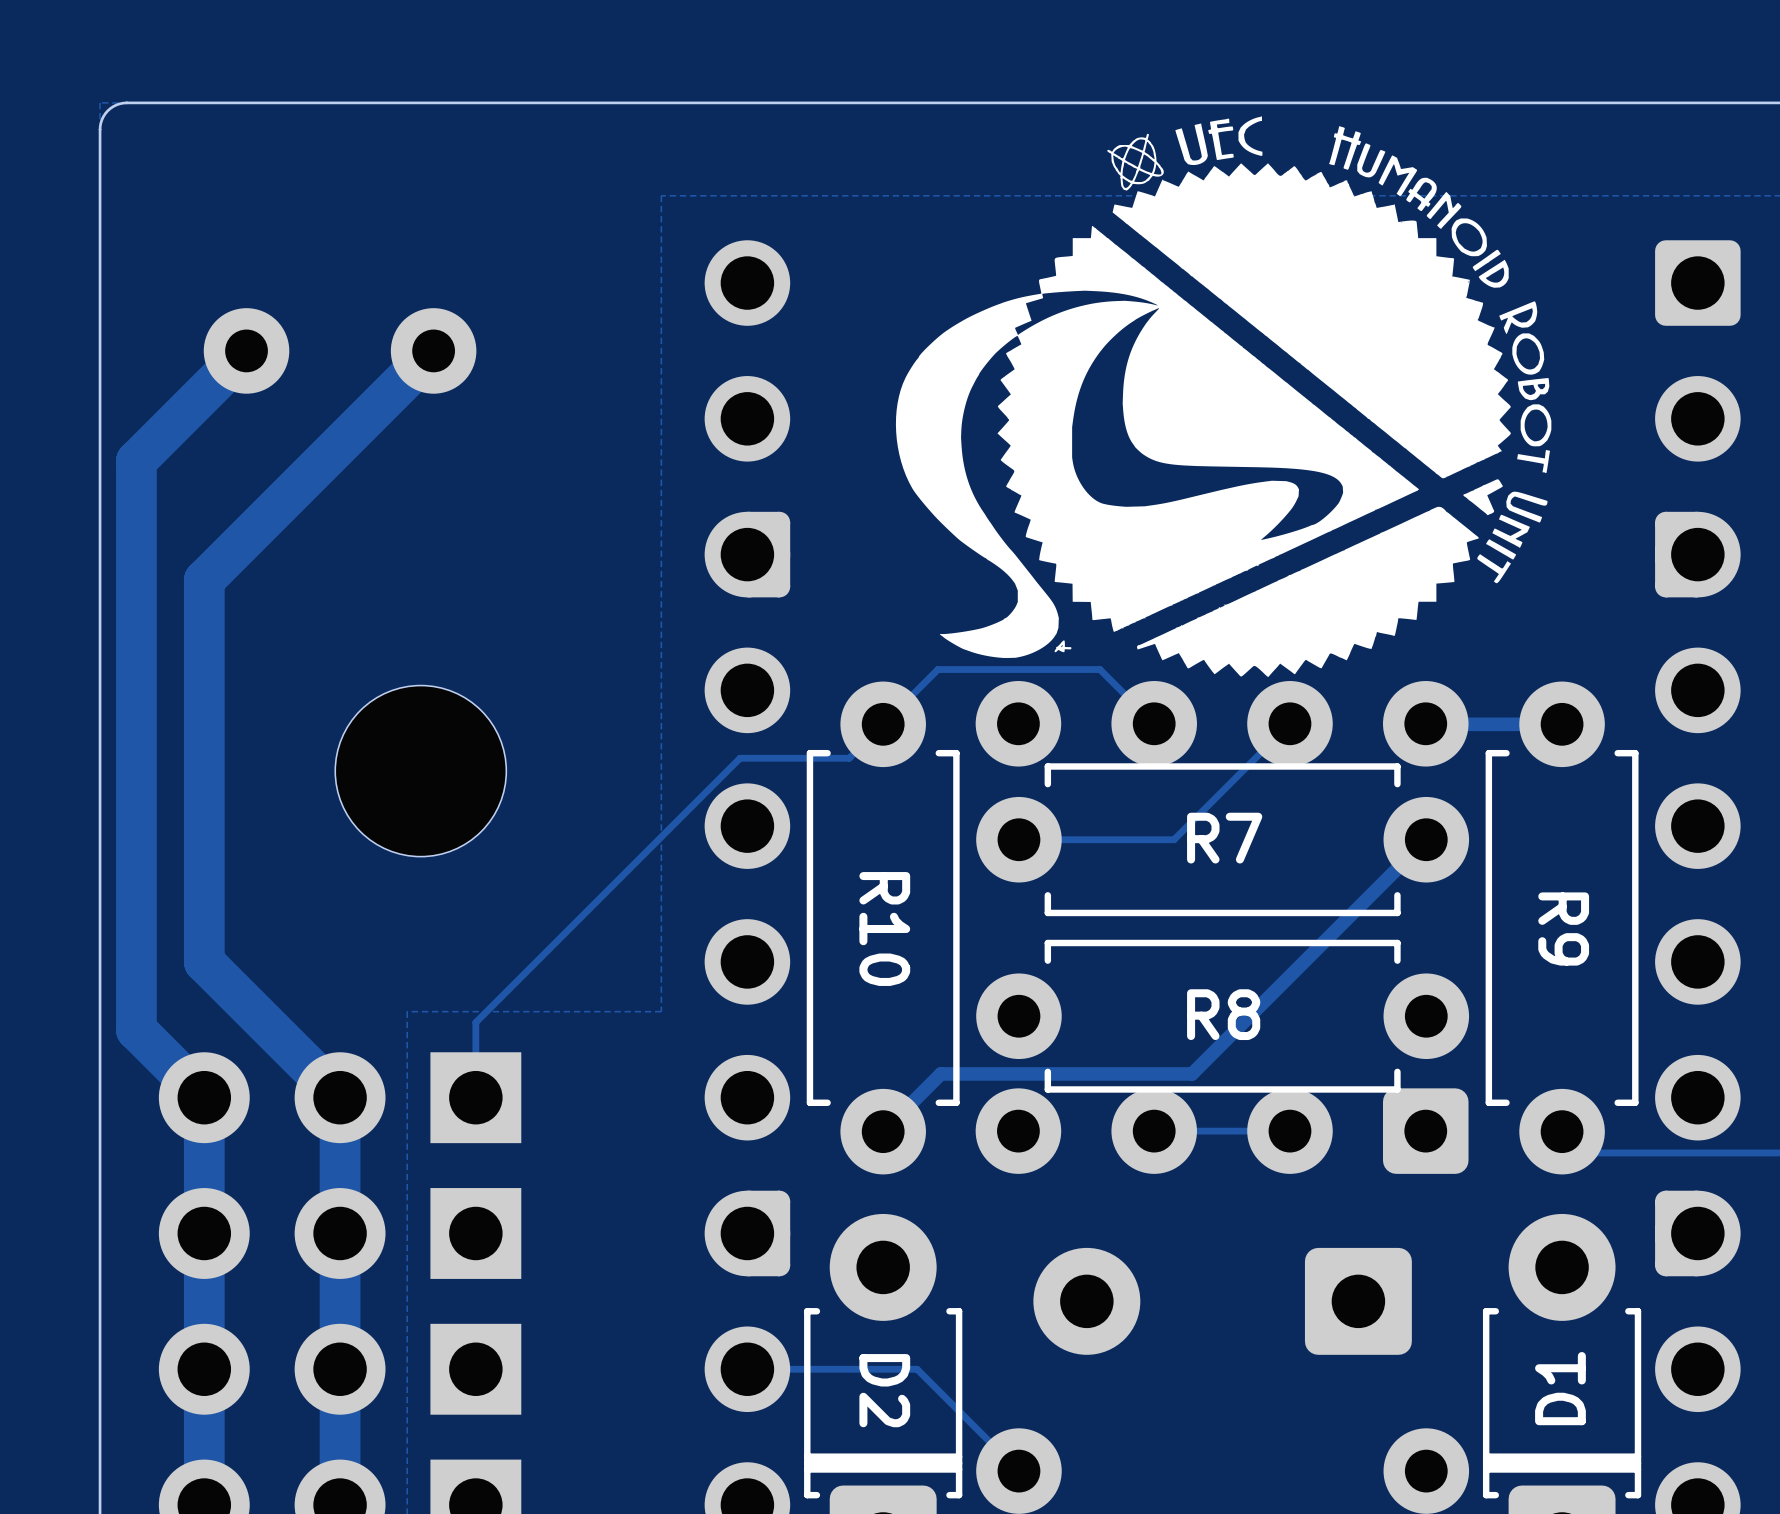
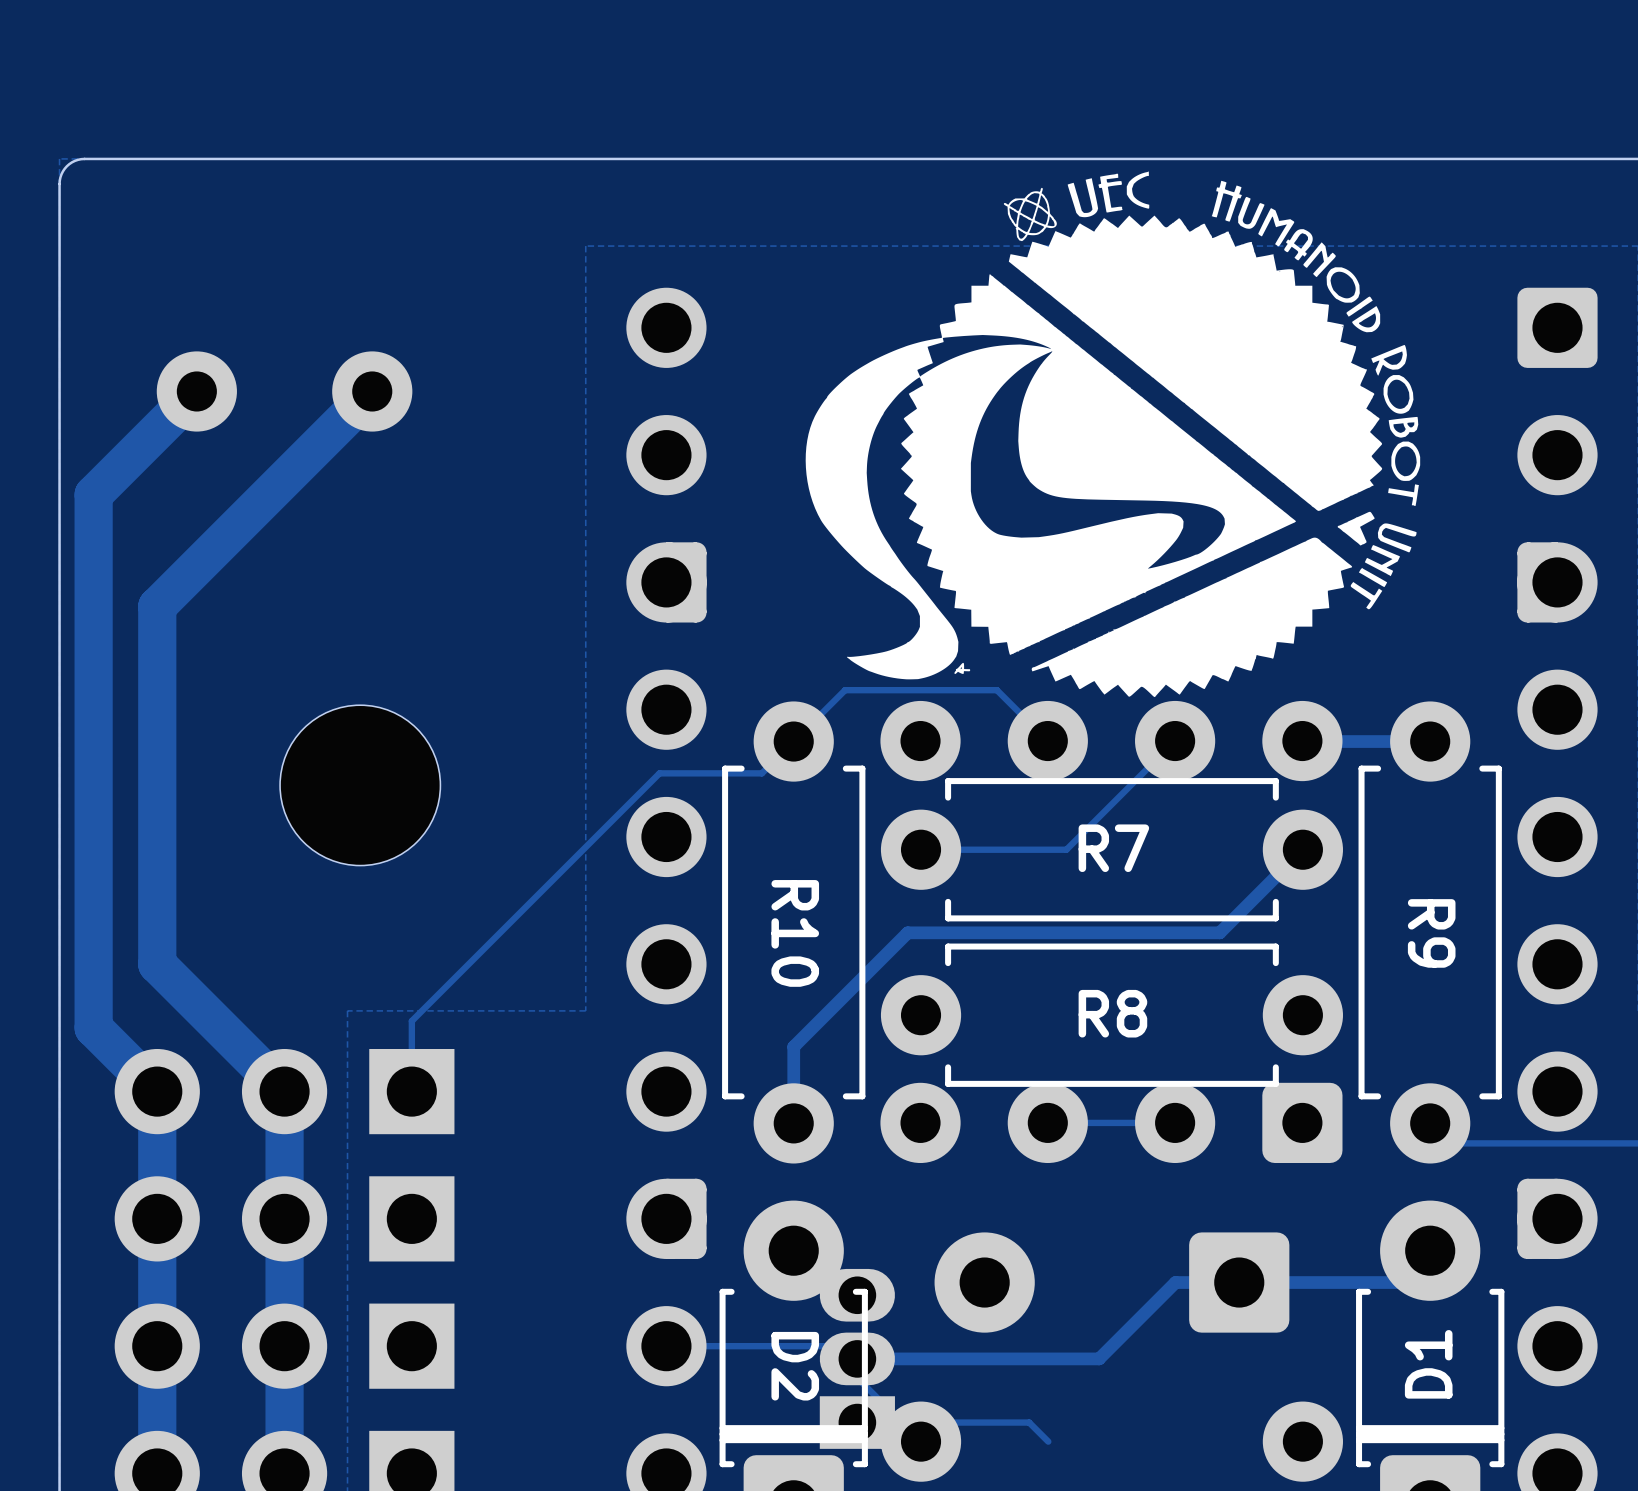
track: (1337, 928) (1192, 1073) (940, 1073) (883, 1131) -> (1219, 932) (907, 932) (793, 1046) (793, 1123)
track: none -> (1430, 1282) (1175, 1282) (1099, 1358) (857, 1358)
part: none -> (857, 1358)
track: none -> (857, 1422) (1029, 1422) (1048, 1441)

